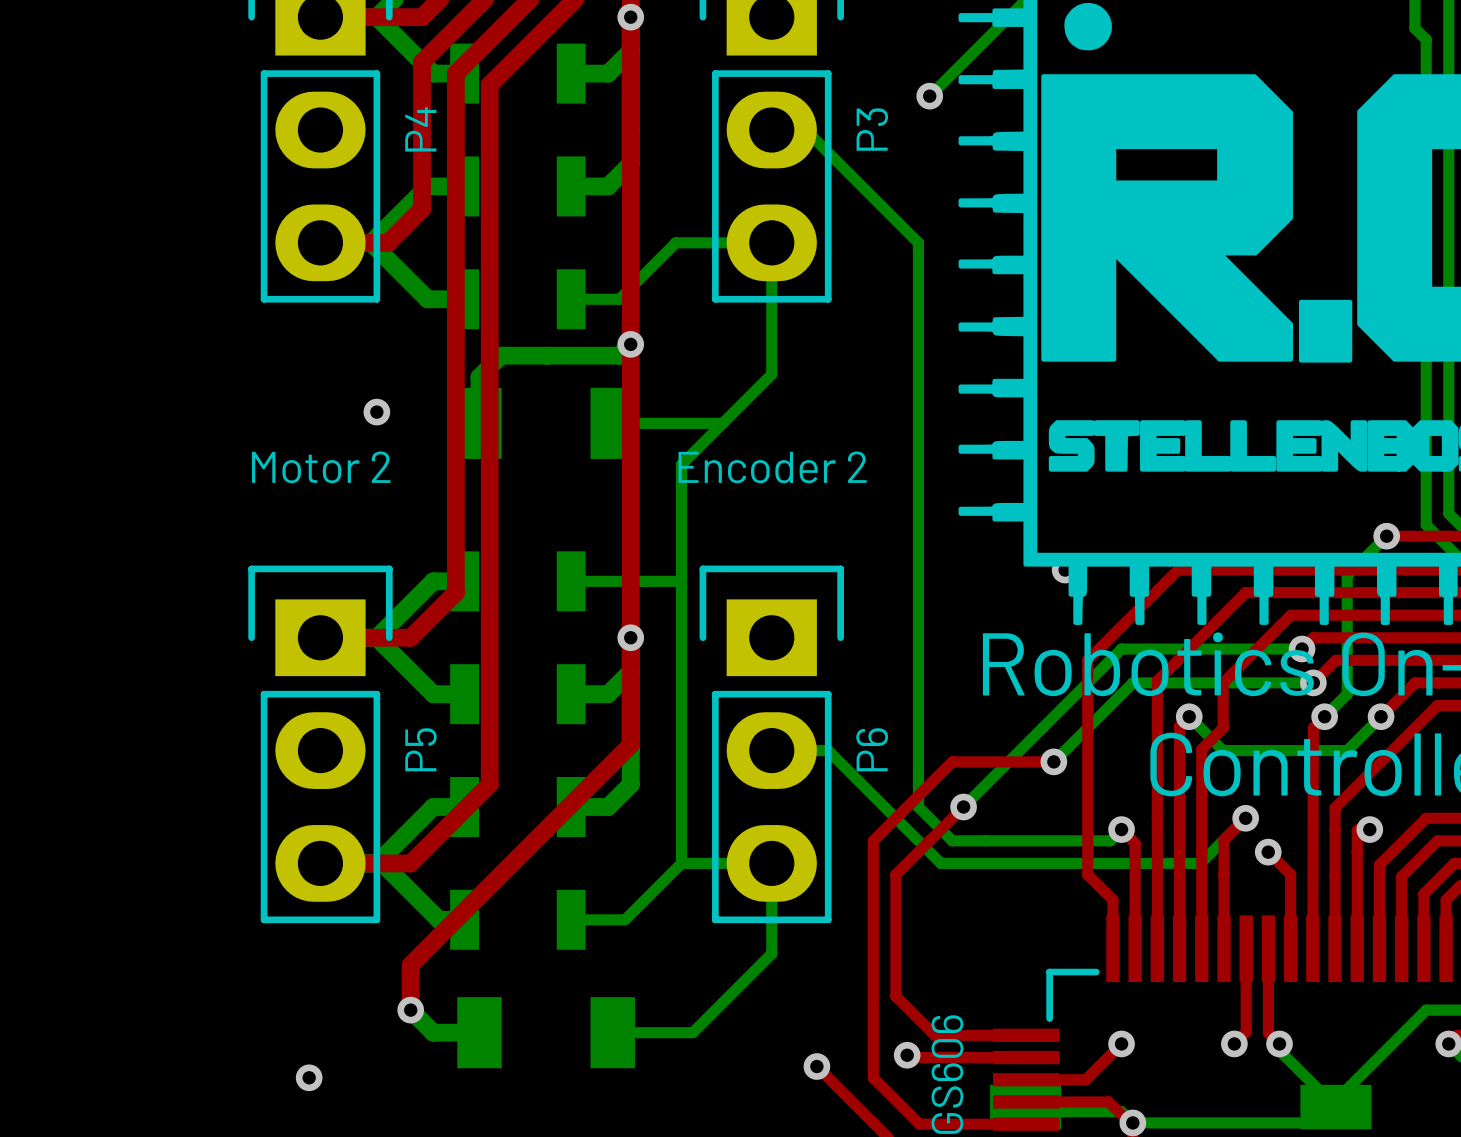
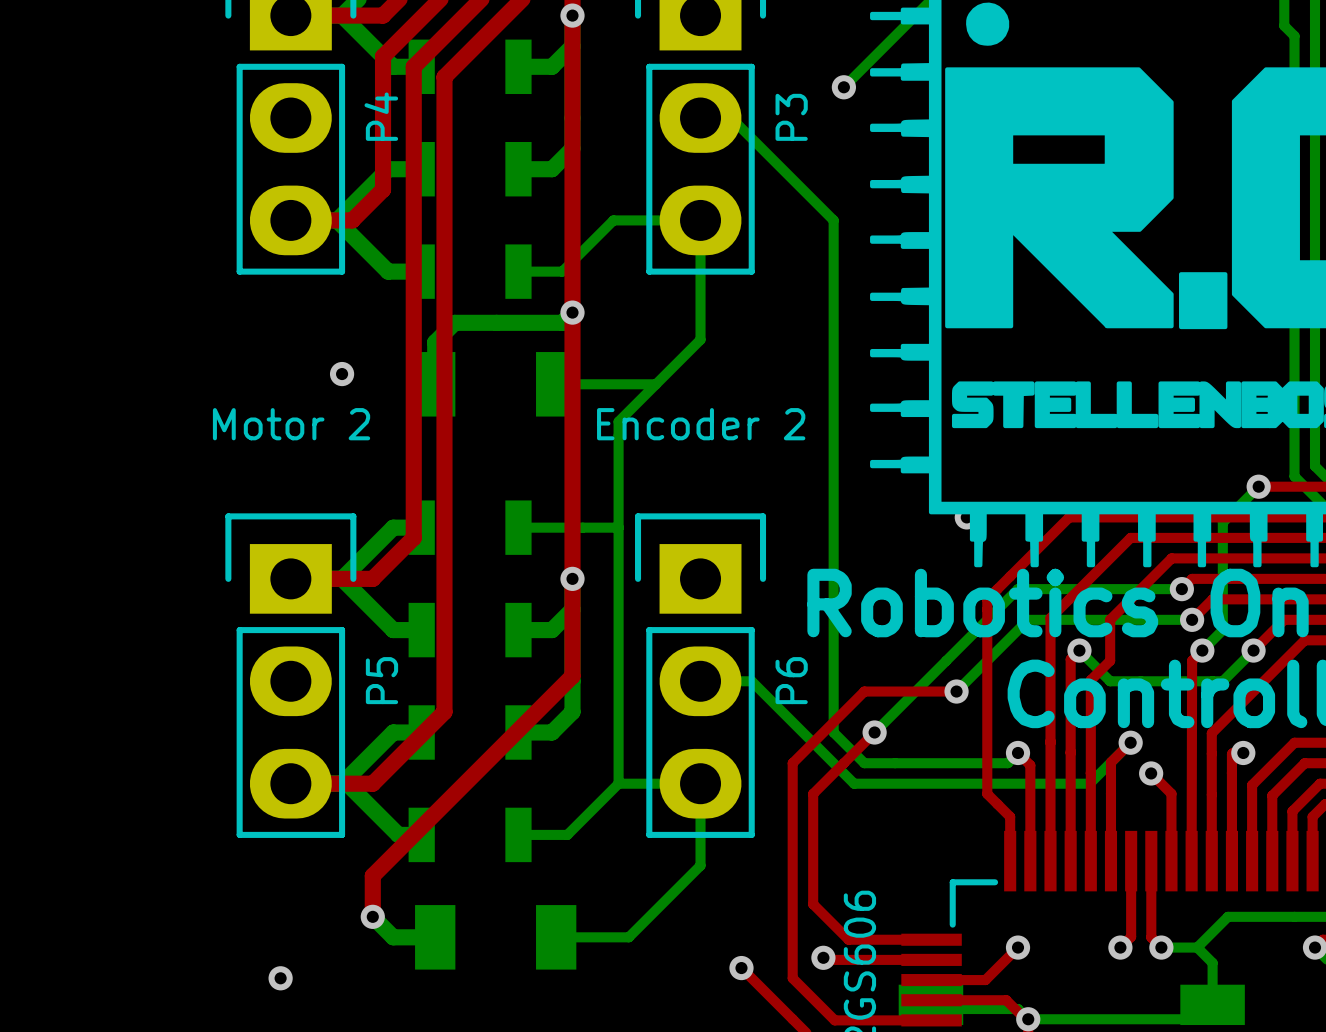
bottom track: (1426, 1010) (1335, 1100) -> (1294, 916) (1227, 916) (1197, 947)
bottom track: (1279, 1043) (1279, 1050) (1335, 1107) -> (1161, 947) (1197, 947)
bottom track: none -> (1197, 947) (1212, 962) (1212, 998)

